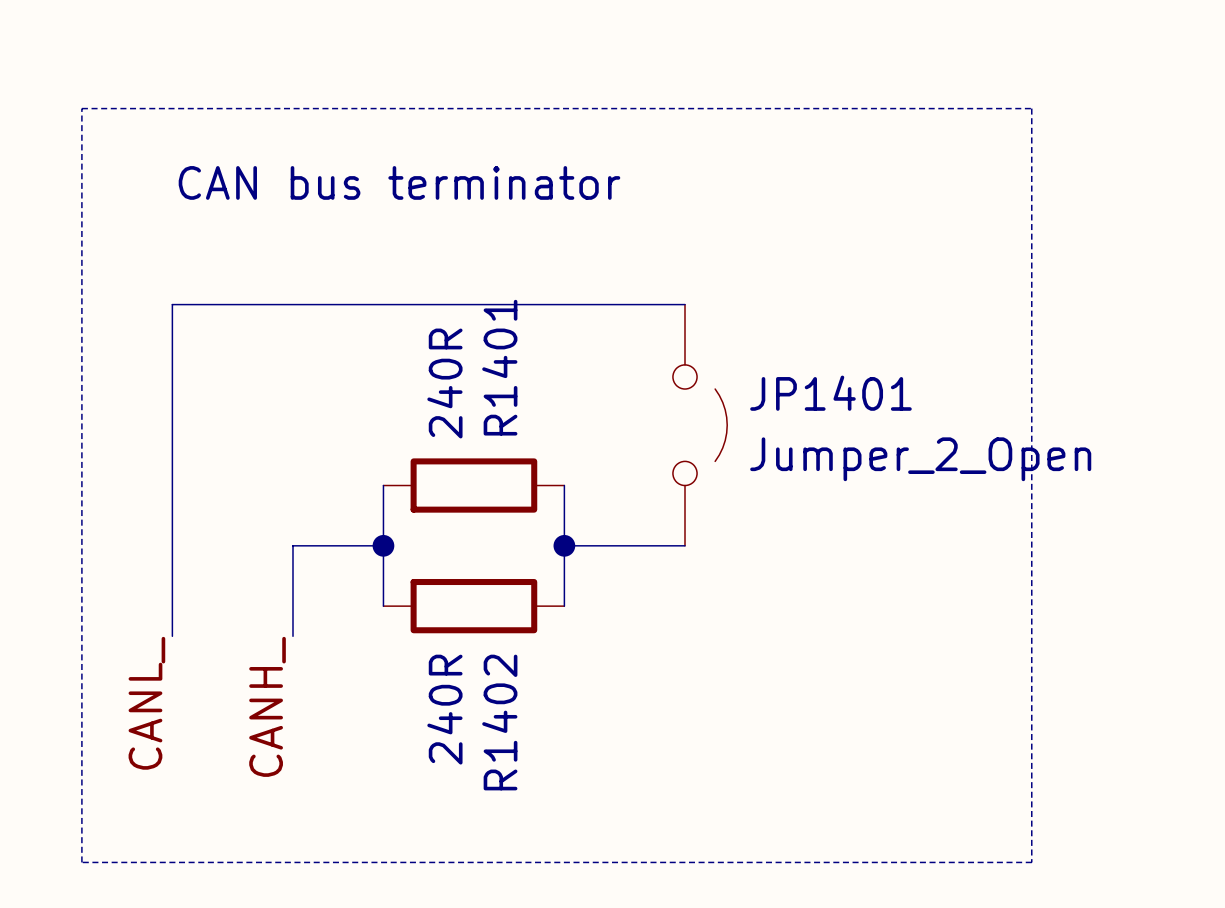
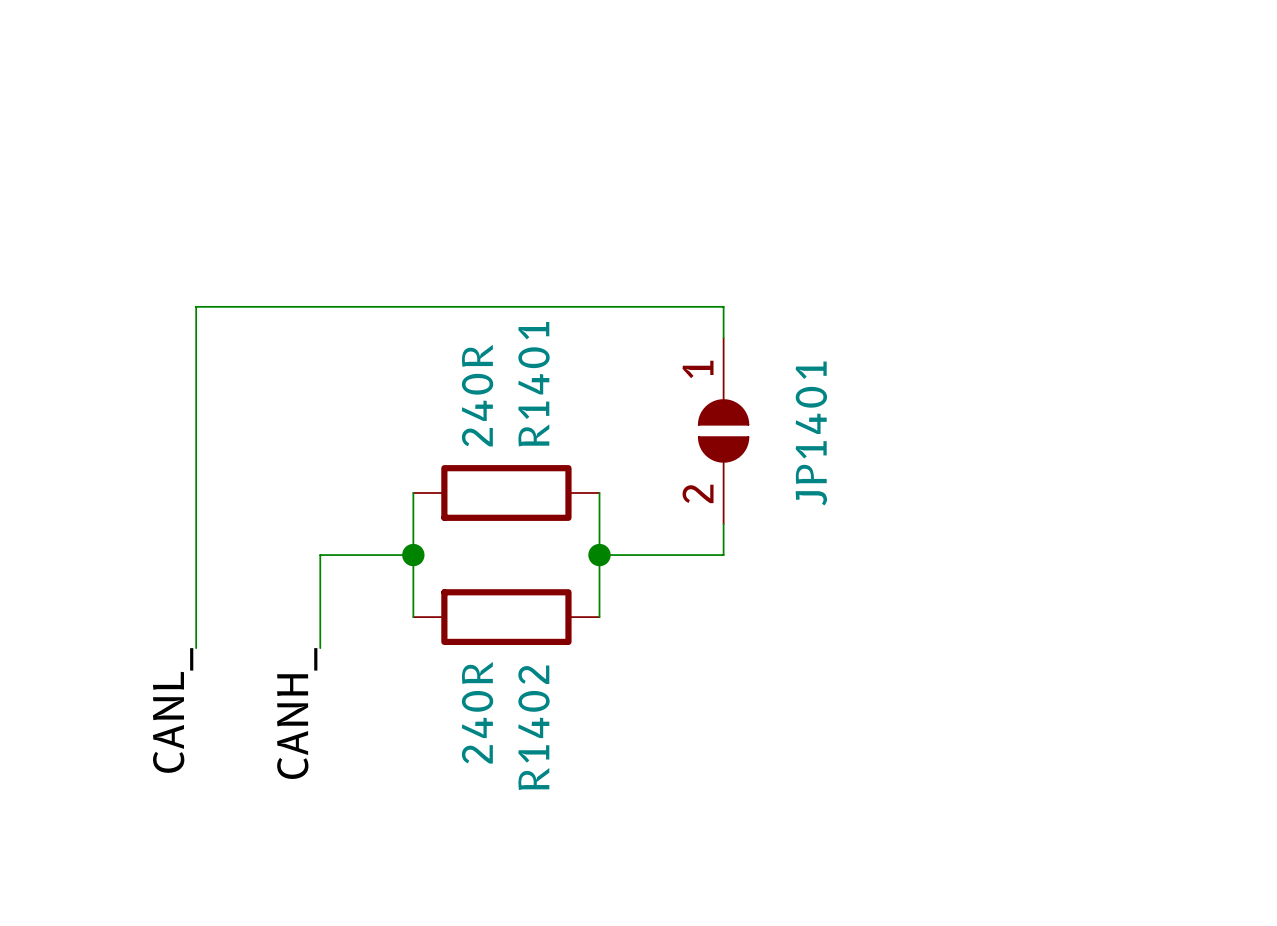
line: (81, 108) (1031, 108) (1031, 862) (81, 862) (81, 108) -> none
text: CAN bus terminator (399, 182) -> none
JP1401 symbol: [672, 304, 728, 546] -> [698, 337, 749, 525]
JP1401 name position: JP1401 (830, 393) -> JP1401 (811, 433)
JP1401 value: Jumper_2_Open (920, 459) -> none

